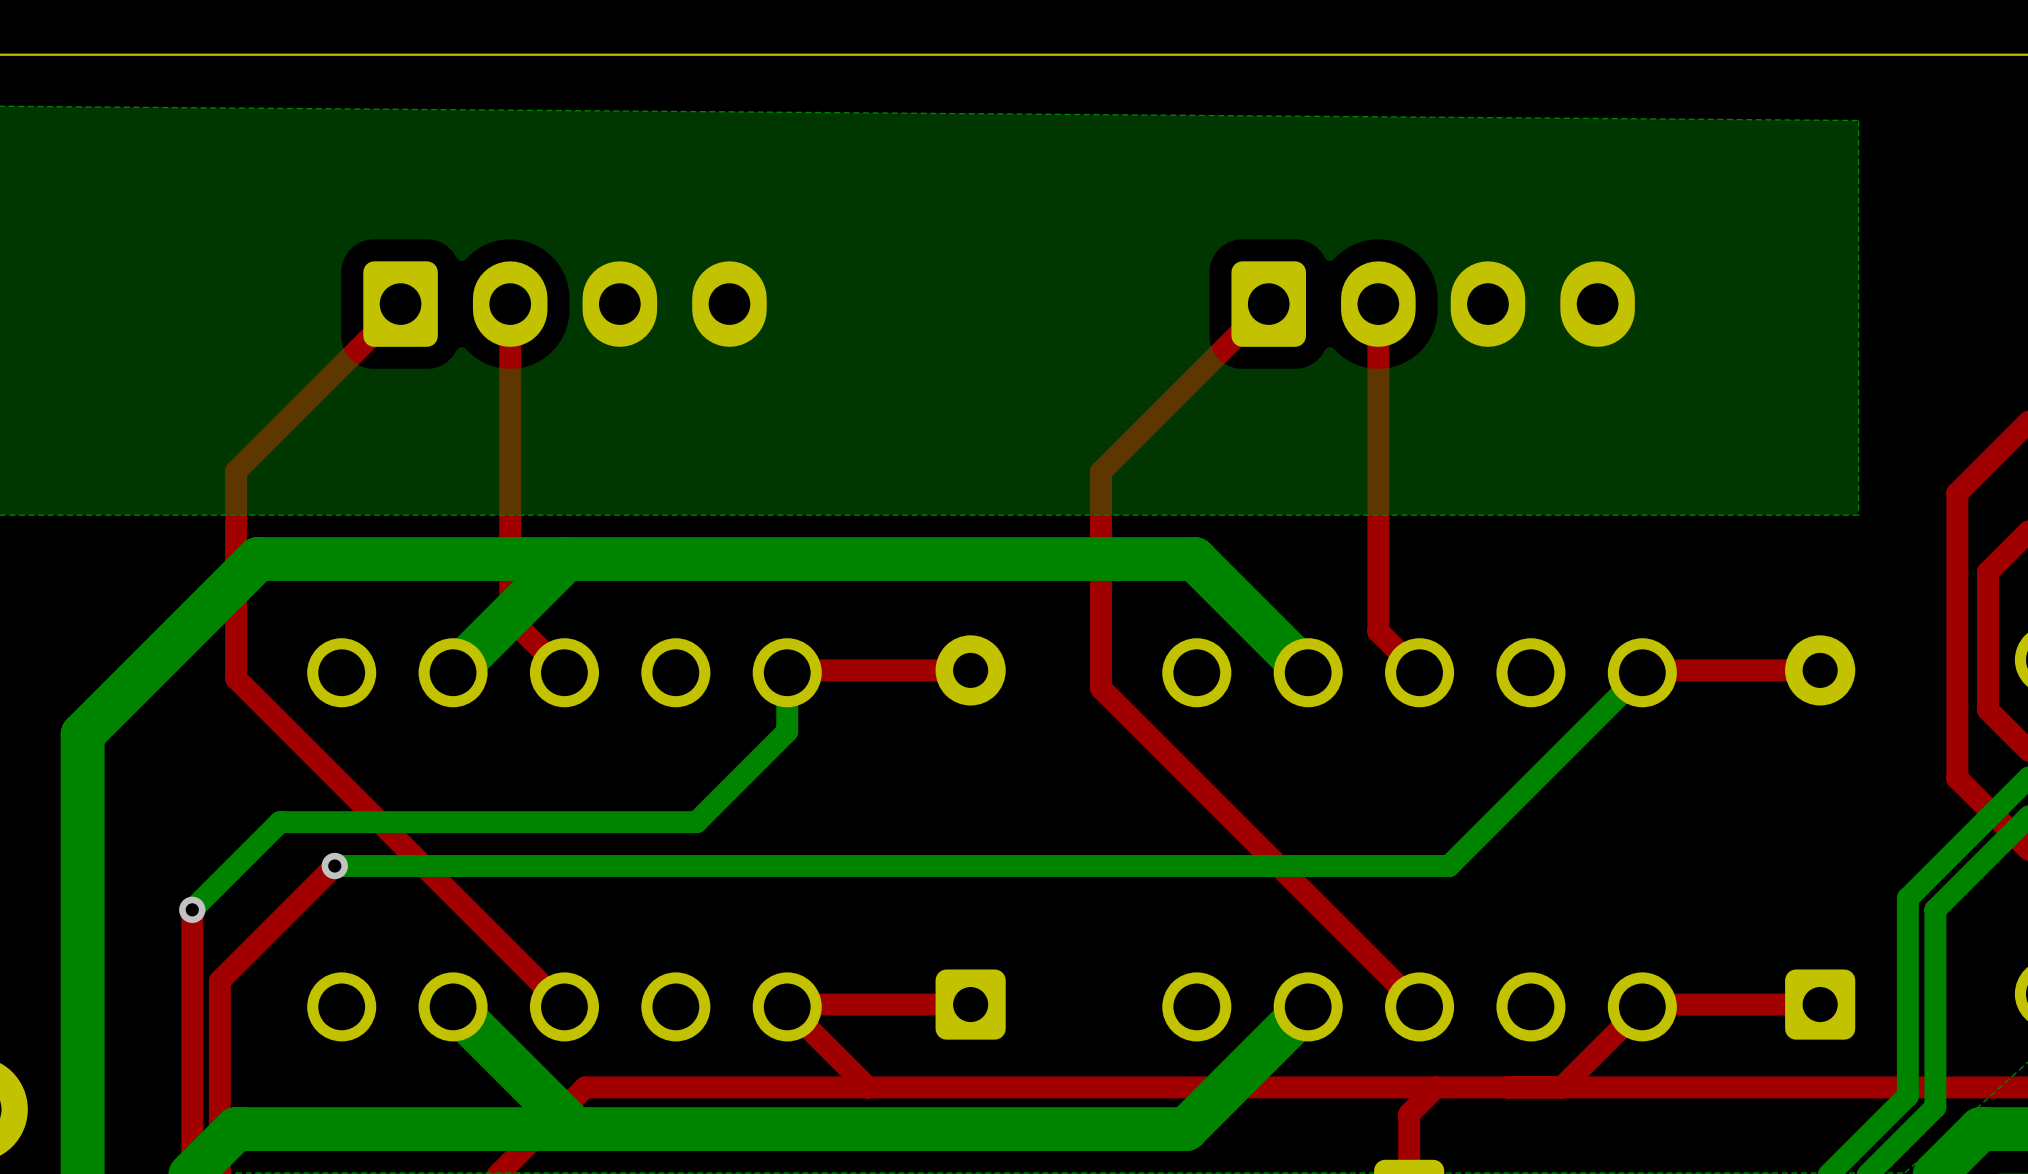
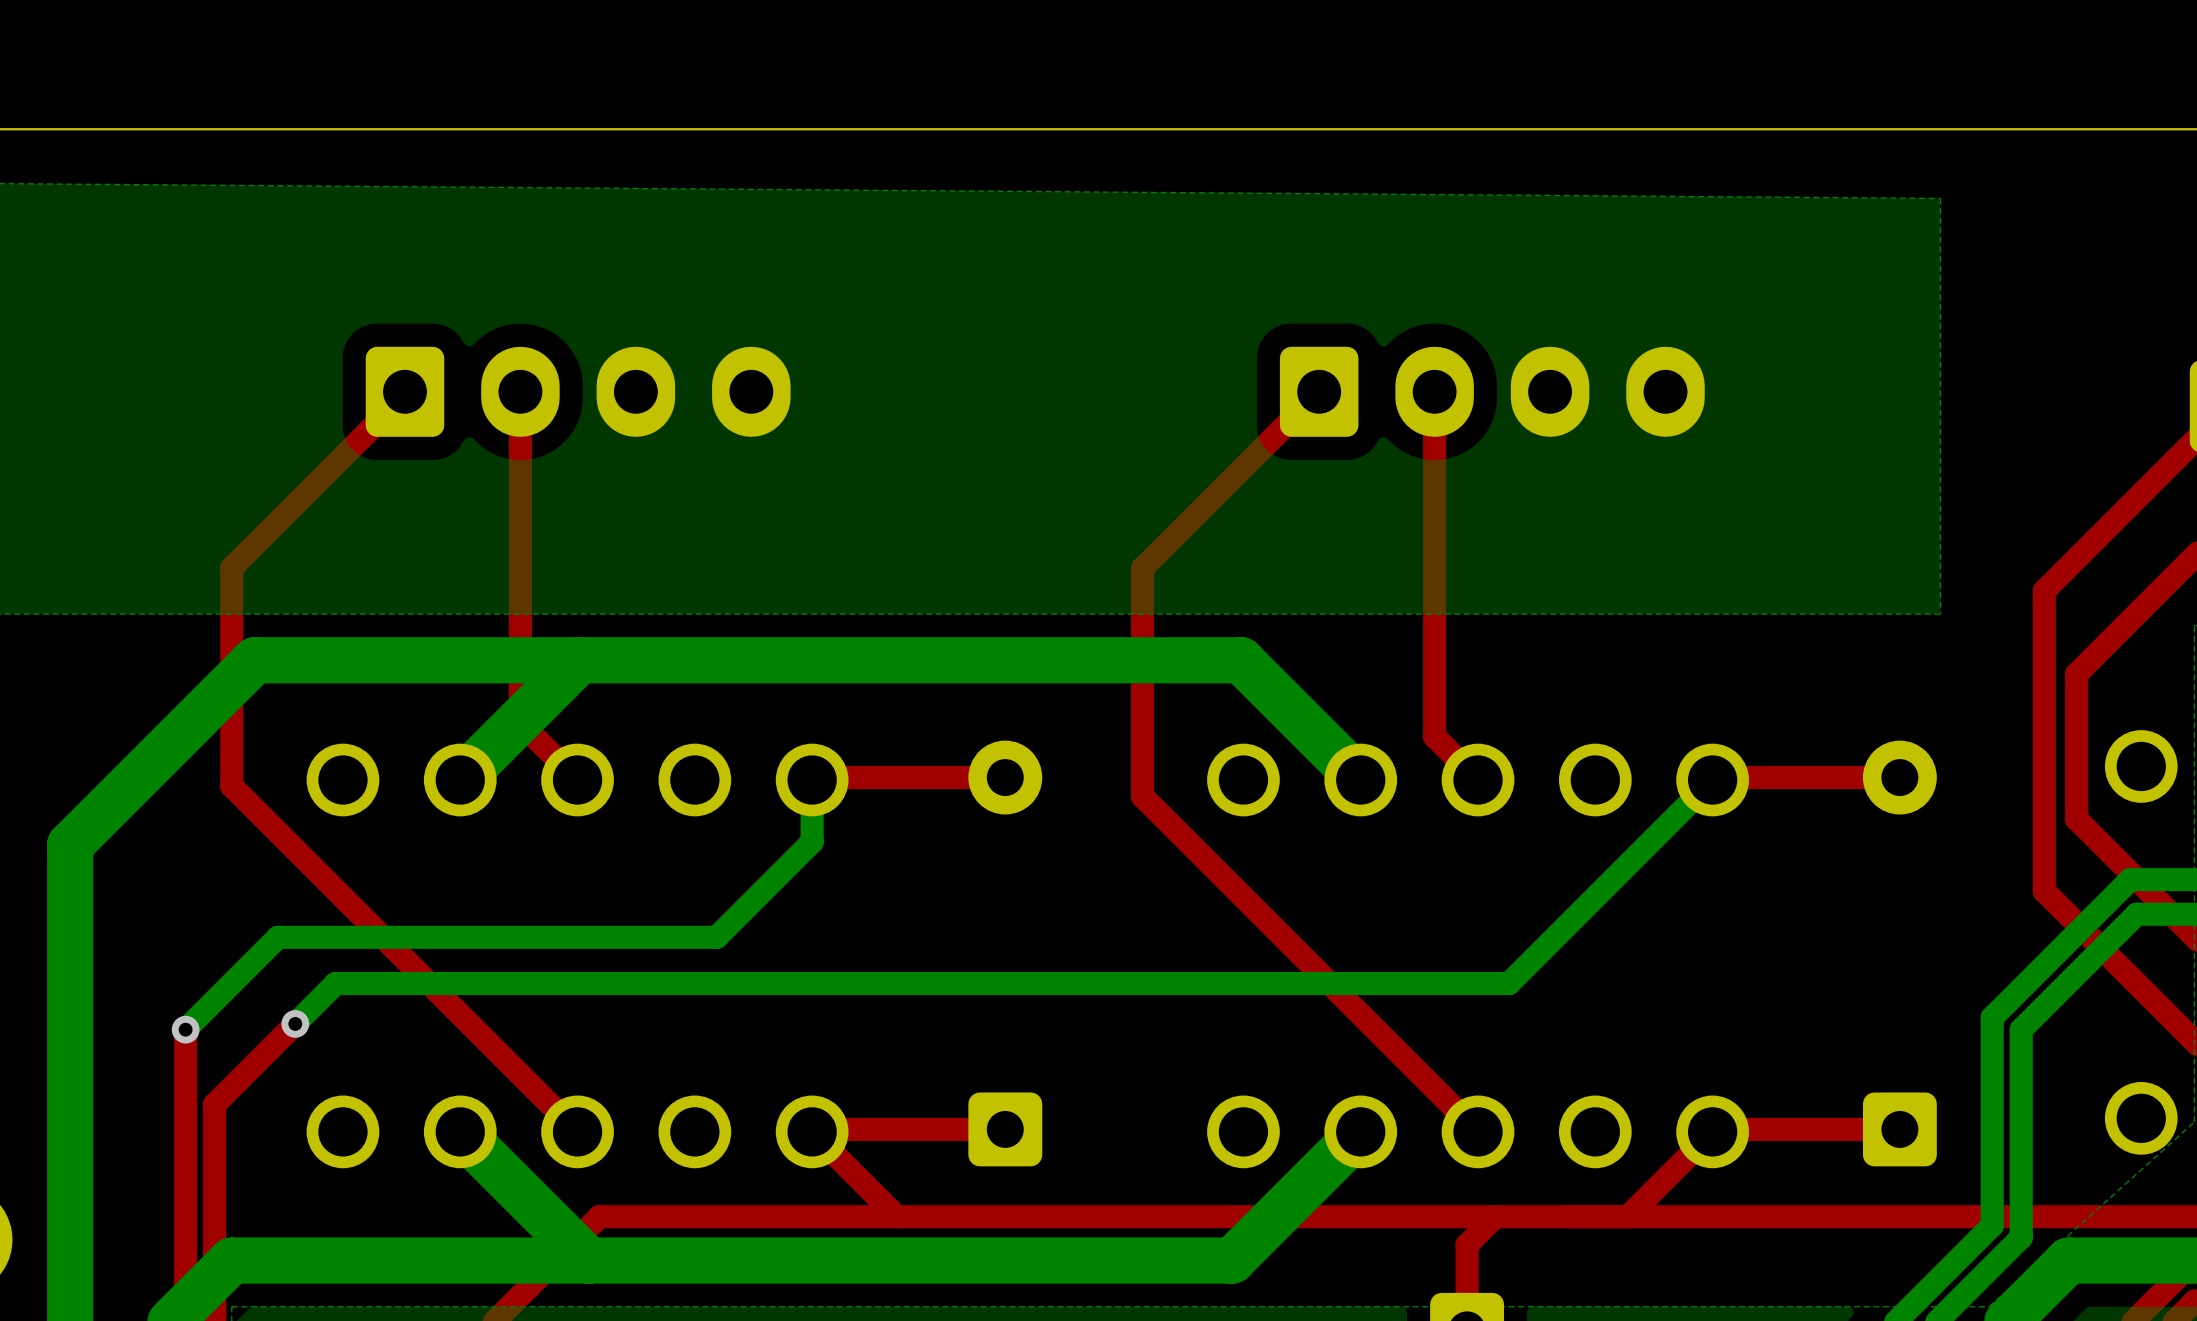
top track: (334, 865) (296, 904) -> none
bottom track: none -> (335, 983) (295, 1023)
via position: (334, 865) -> (295, 1023)

